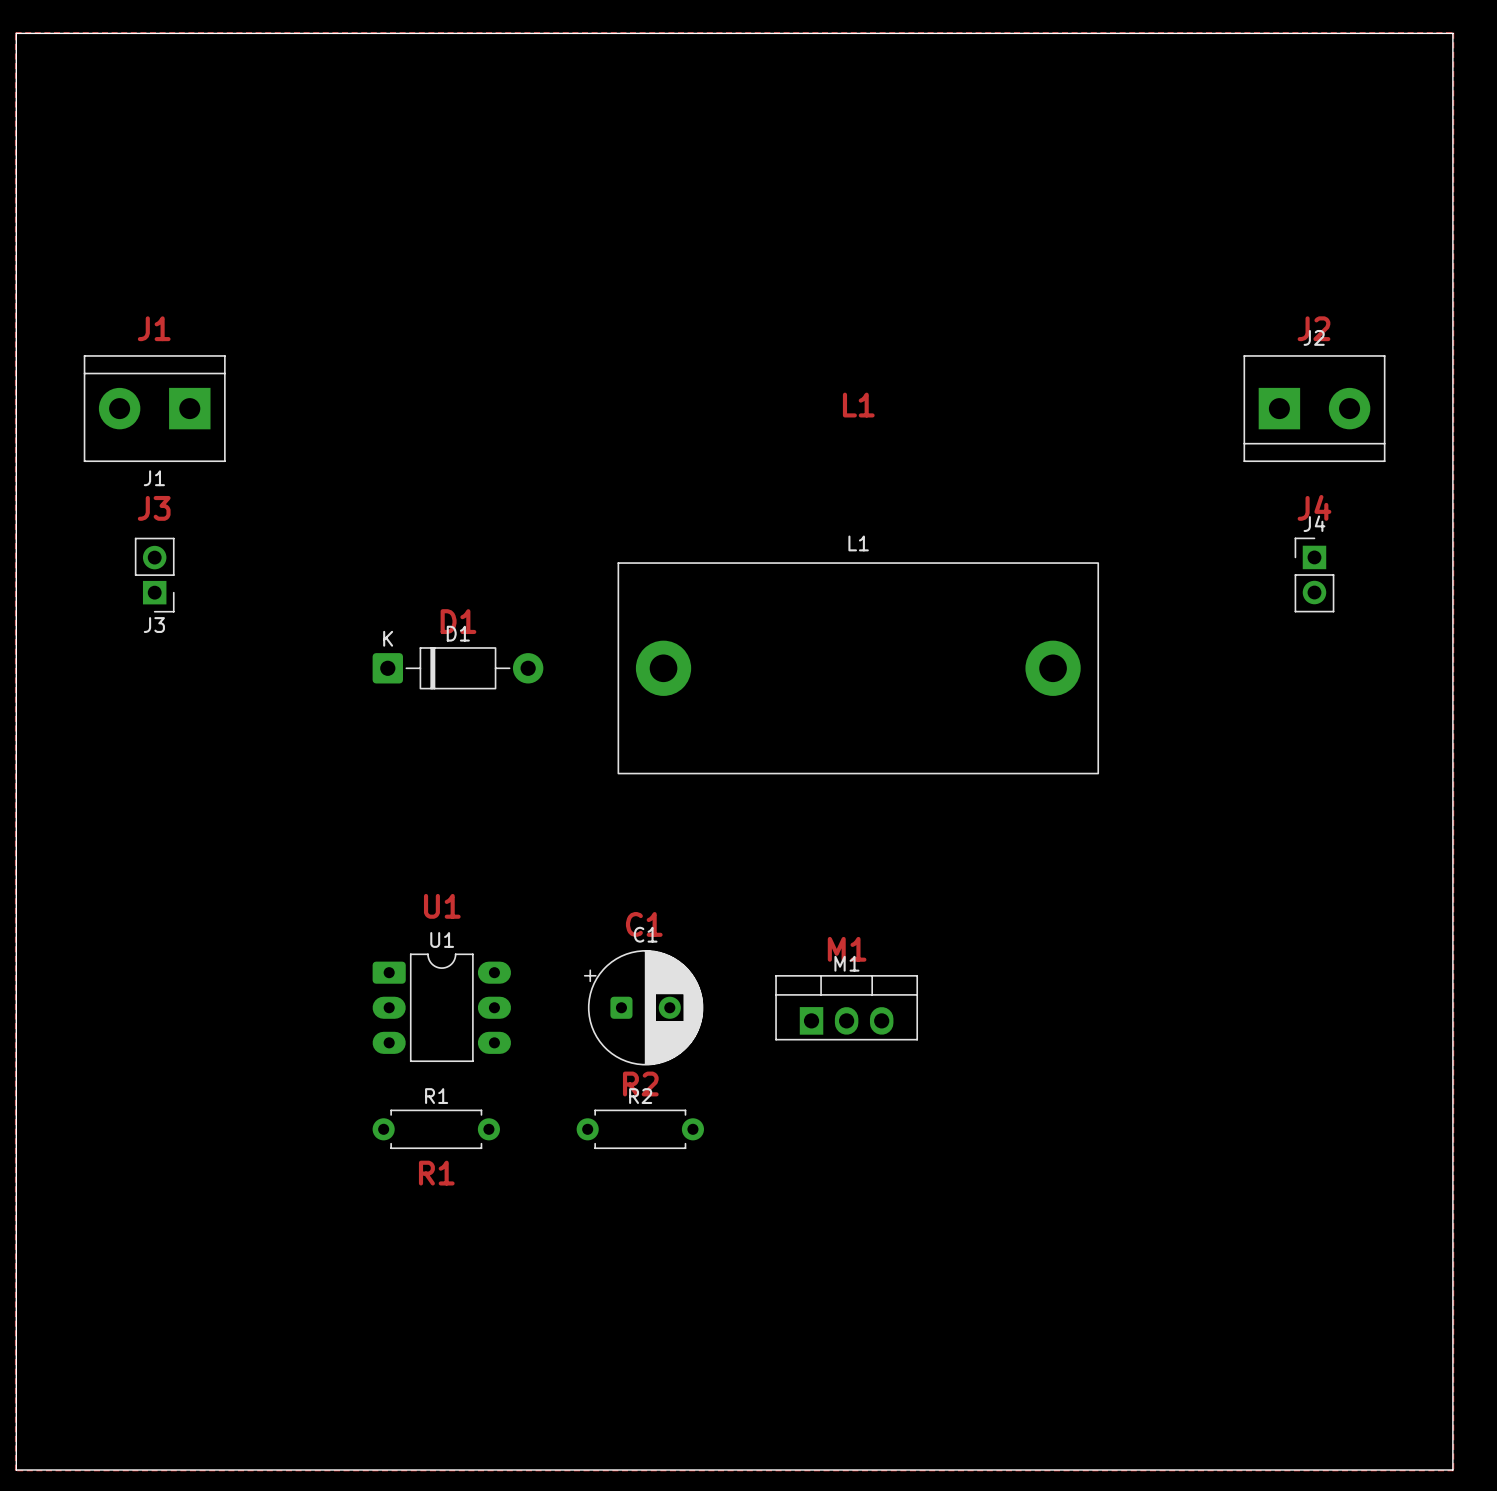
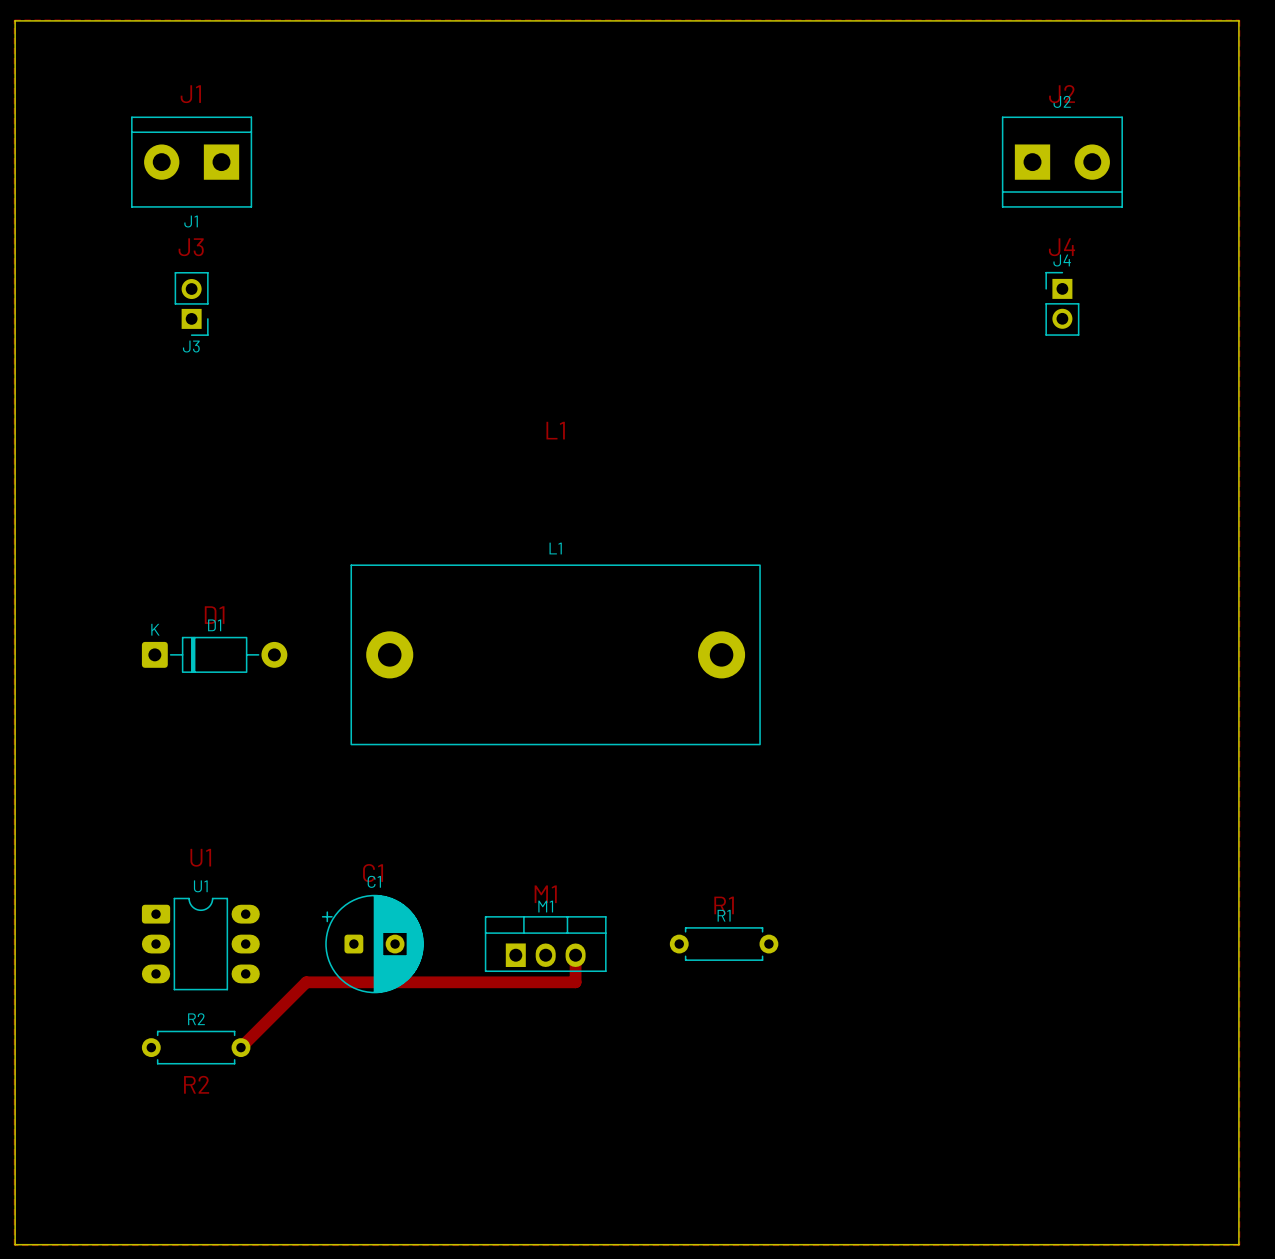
text position: J1 (154, 328) -> J1 (190, 94)
text position: J2 (1313, 328) -> J2 (1062, 94)
text position: L1 (858, 405) -> L1 (555, 430)
J1 position: (154, 408) -> (191, 162)
J2 position: (1314, 408) -> (1062, 162)
text position: J4 (1314, 507) -> J4 (1062, 247)
text position: J3 (154, 508) -> J3 (191, 247)
J4 position: (1314, 574) -> (1062, 303)
J3 position: (154, 575) -> (191, 303)
text position: D1 (458, 621) -> D1 (214, 615)
D1 position: (457, 668) -> (214, 654)
L1 position: (858, 668) -> (555, 654)
text position: U1 (442, 906) -> U1 (200, 857)
text position: C1 (644, 924) -> C1 (373, 873)
text position: M1 (847, 949) -> M1 (545, 894)
U1 position: (441, 1007) -> (200, 944)
C1 position: (643, 1007) -> (372, 944)
M1 position: (846, 1007) -> (545, 944)
text: none -> R1 (724, 905)
text: R2 (640, 1084) -> none
R1 position: (436, 1129) -> (724, 944)
R2 position: (640, 1129) -> (196, 1047)
track: none -> (575, 955) (575, 982) (306, 982) (240, 1047)
text: R1 (436, 1173) -> none
text: none -> R2 (196, 1084)

